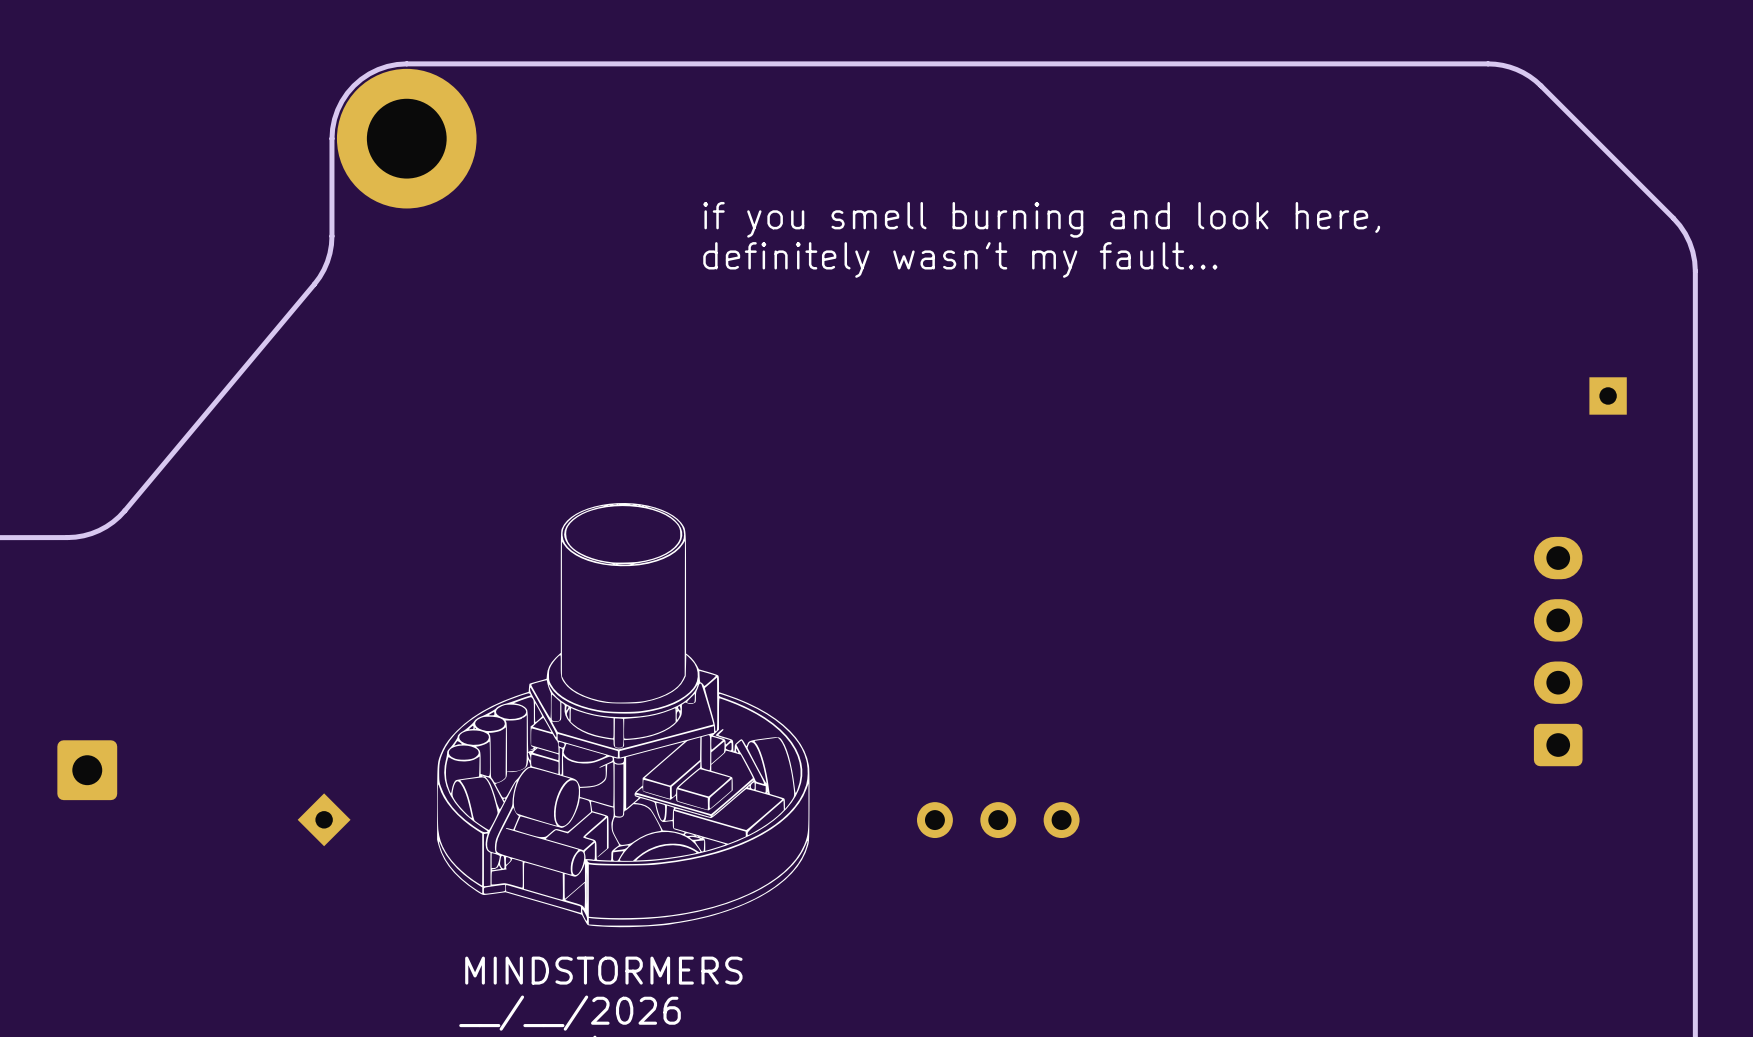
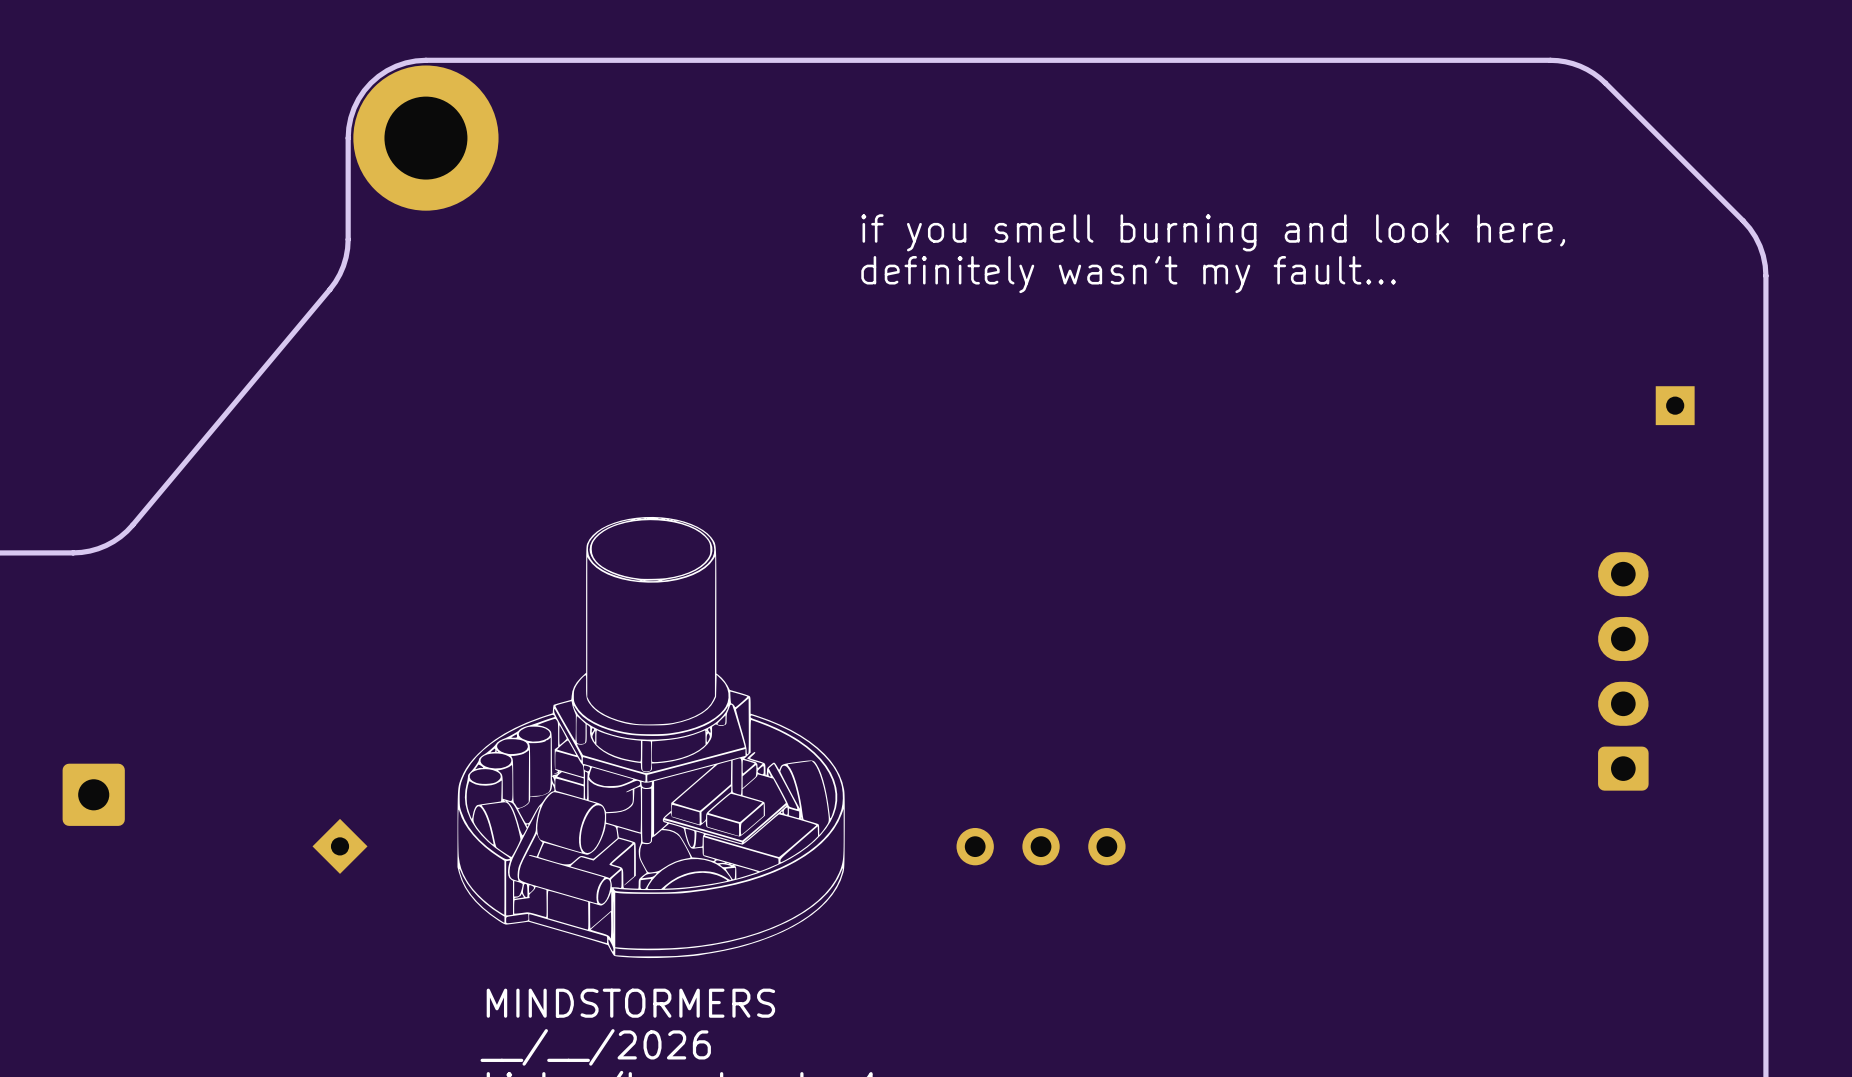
text position: if you smell burning and look here, (1041, 219) -> if you smell burning and look here, (1213, 232)
text position: definitely wasn't my fault... (960, 259) -> definitely wasn't my fault... (1128, 274)

